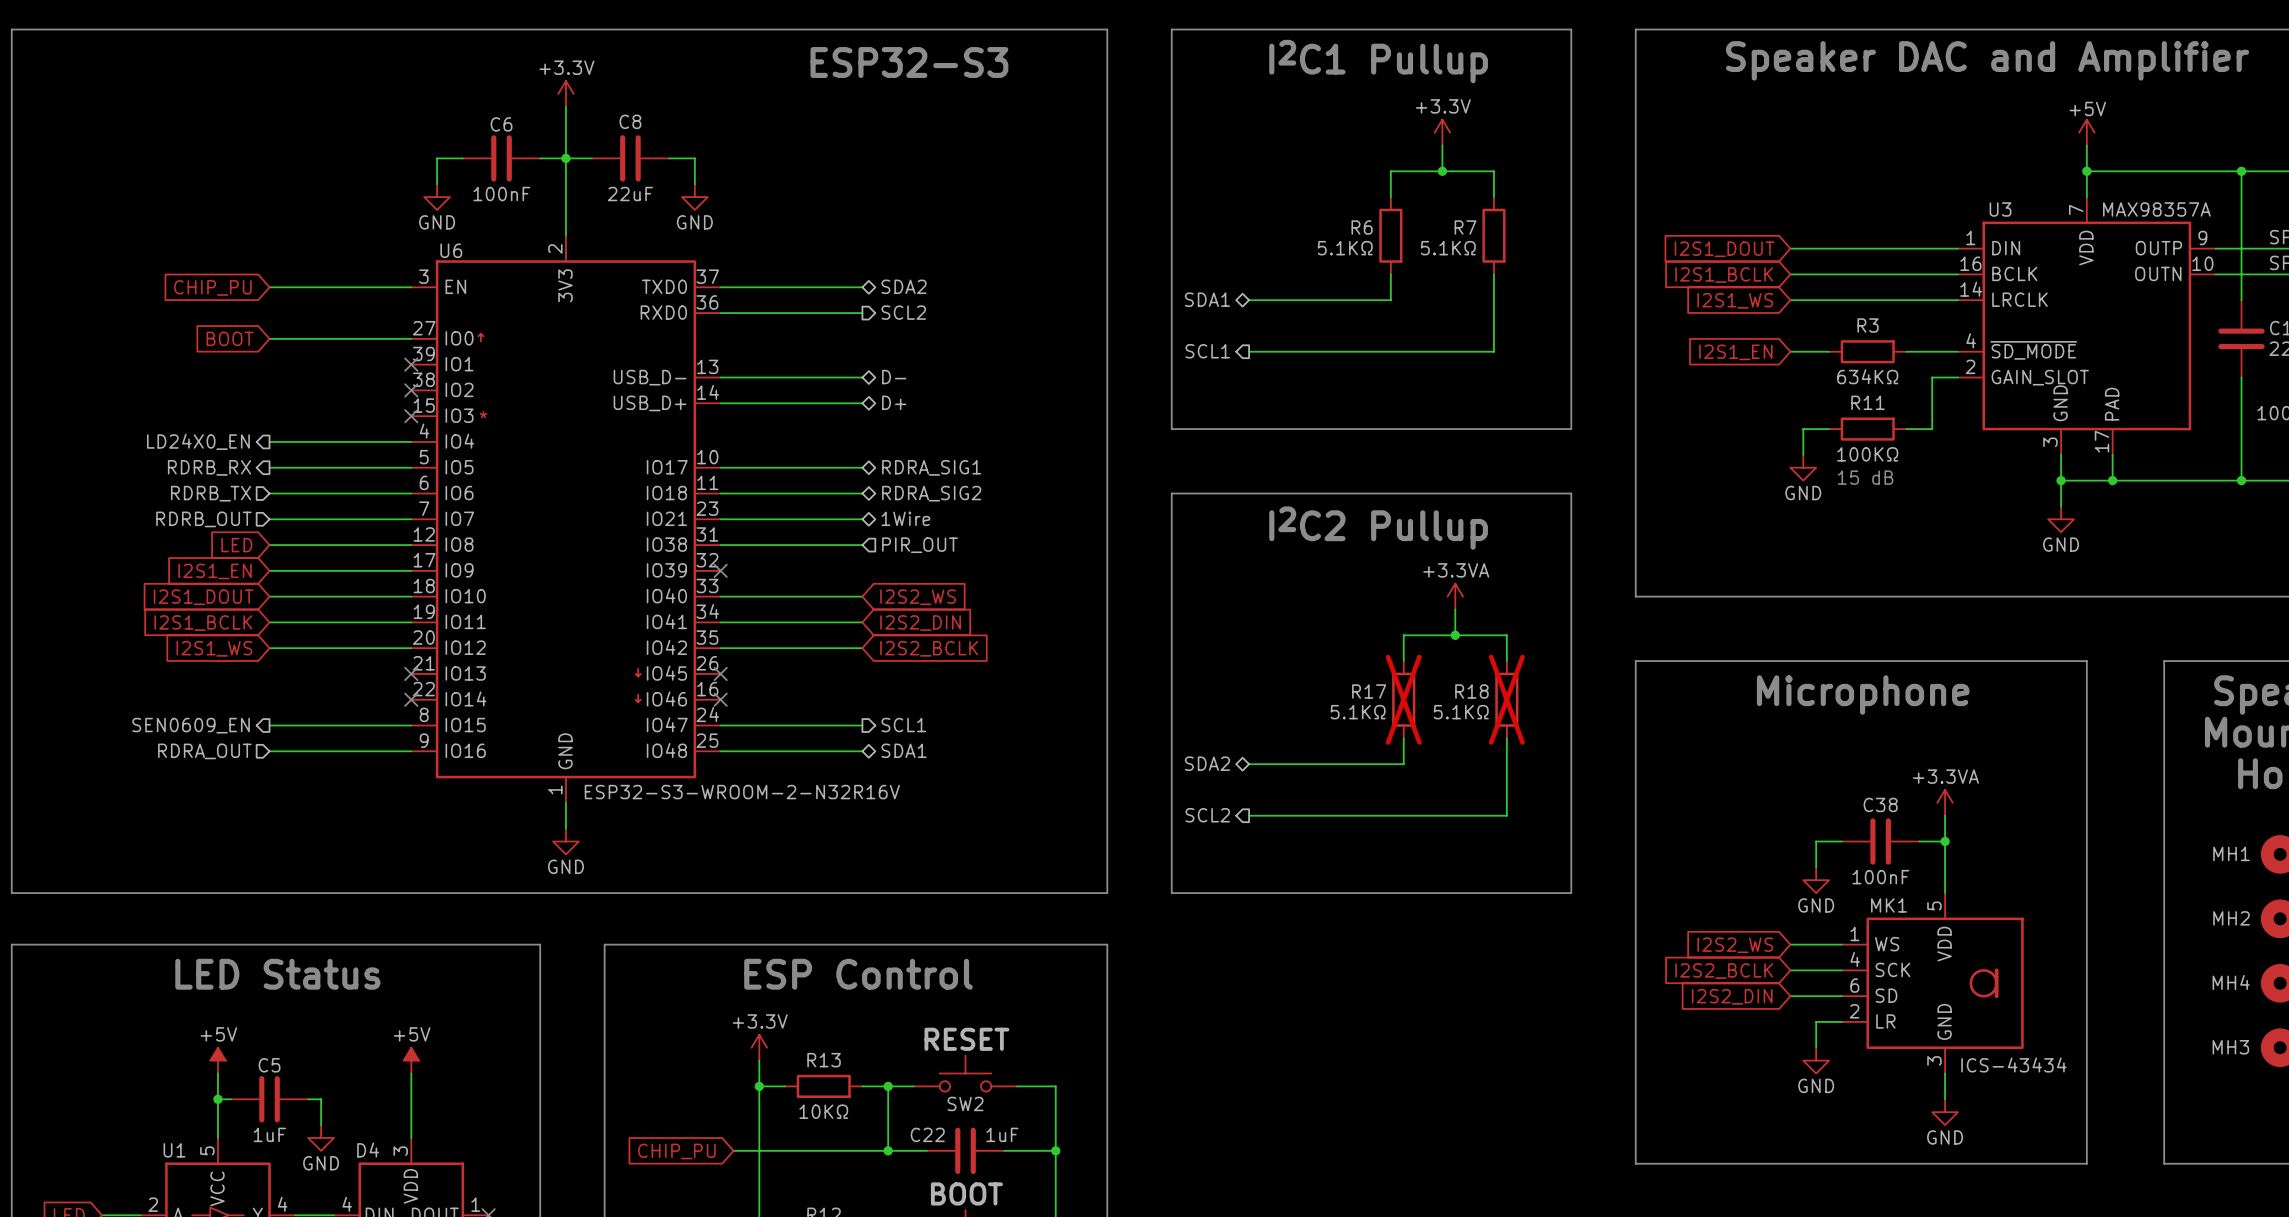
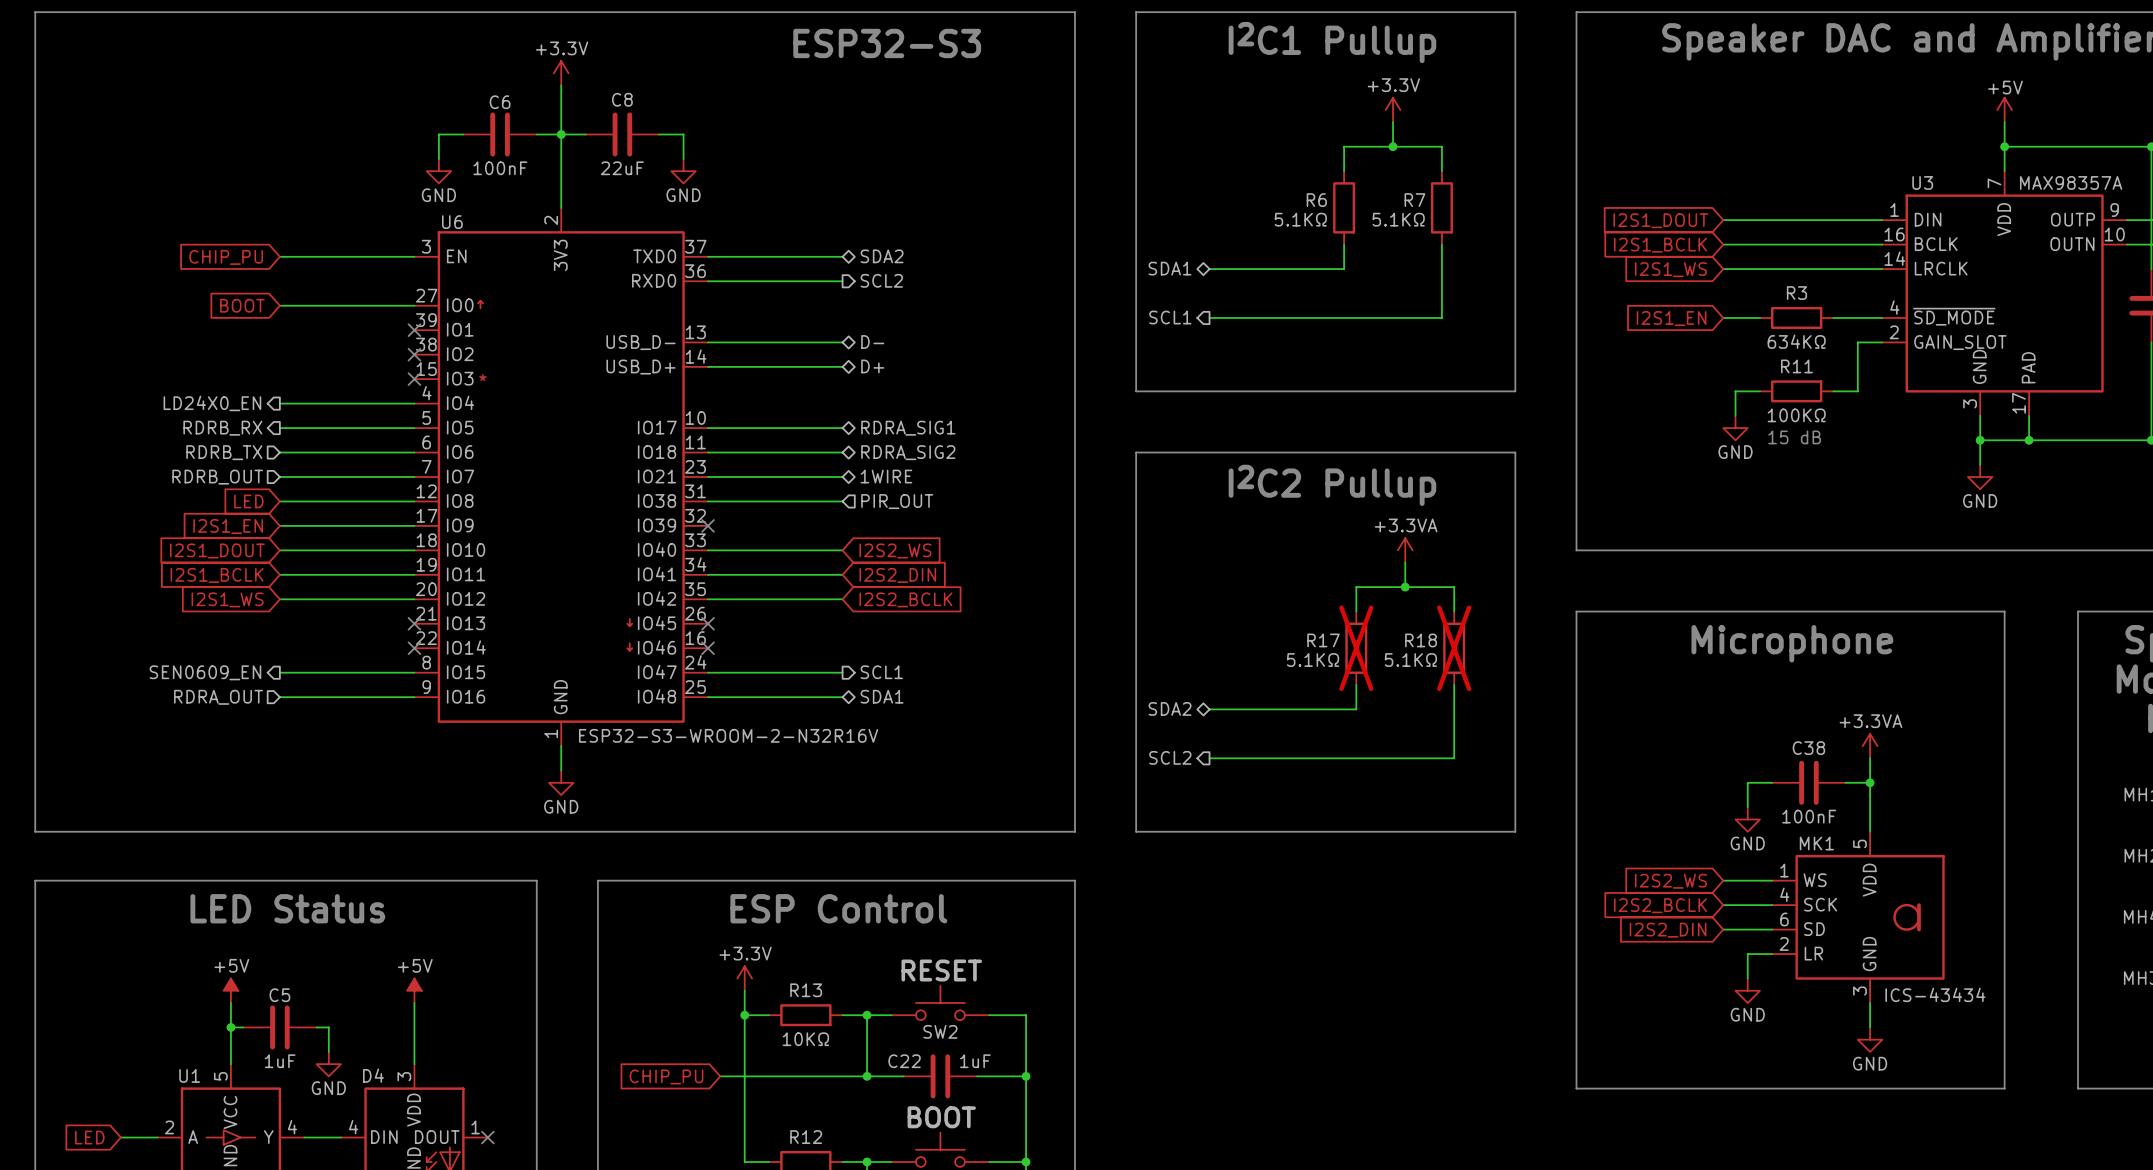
hierarchical label: 1Wire (905, 518) -> 1WIRE (886, 476)

